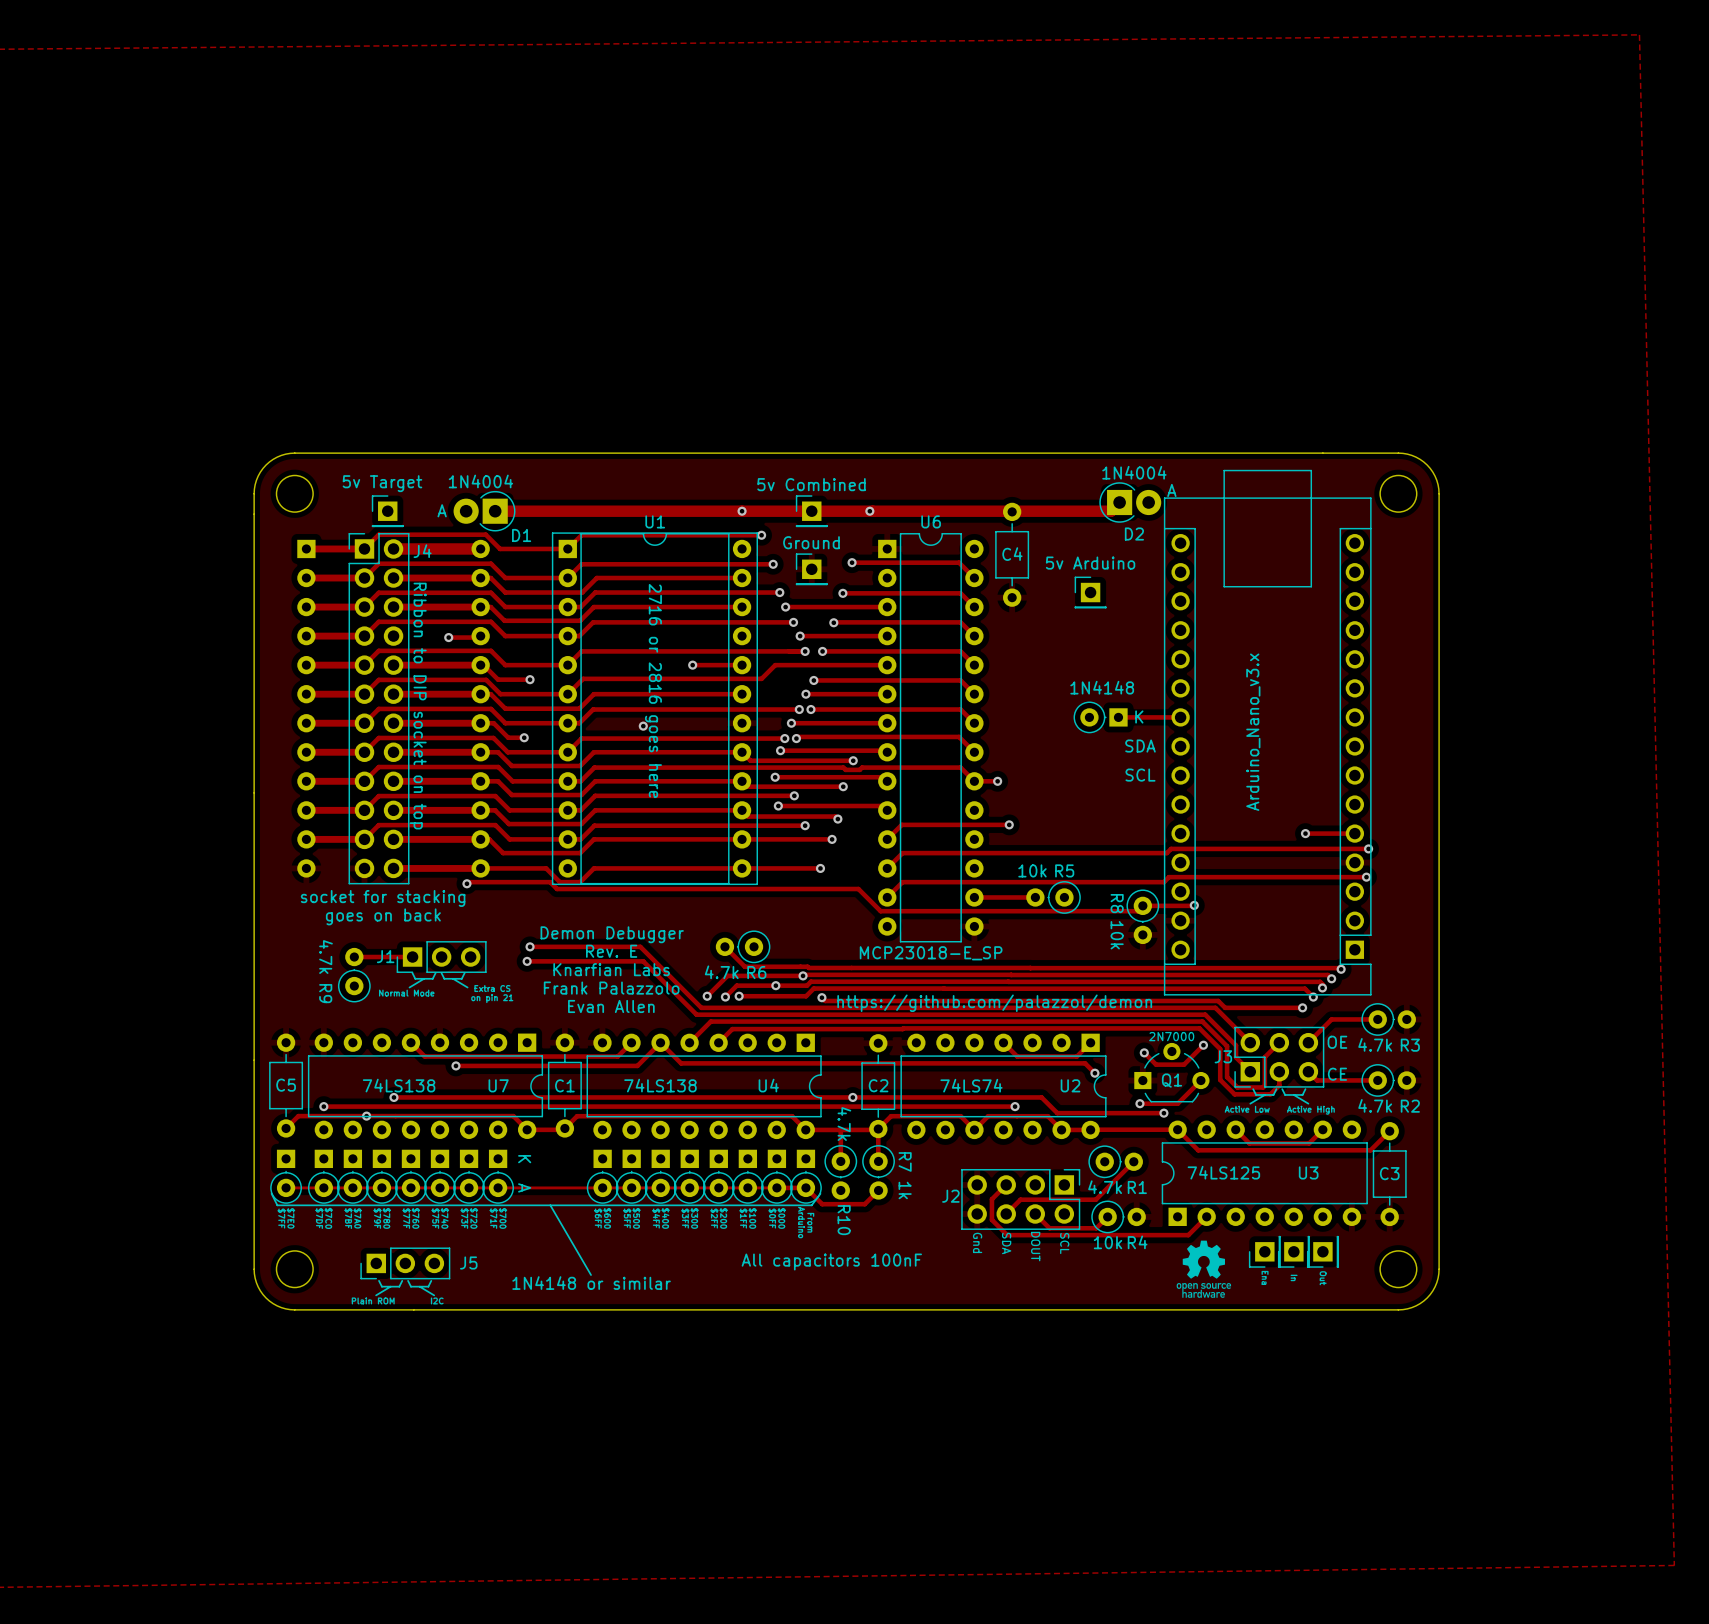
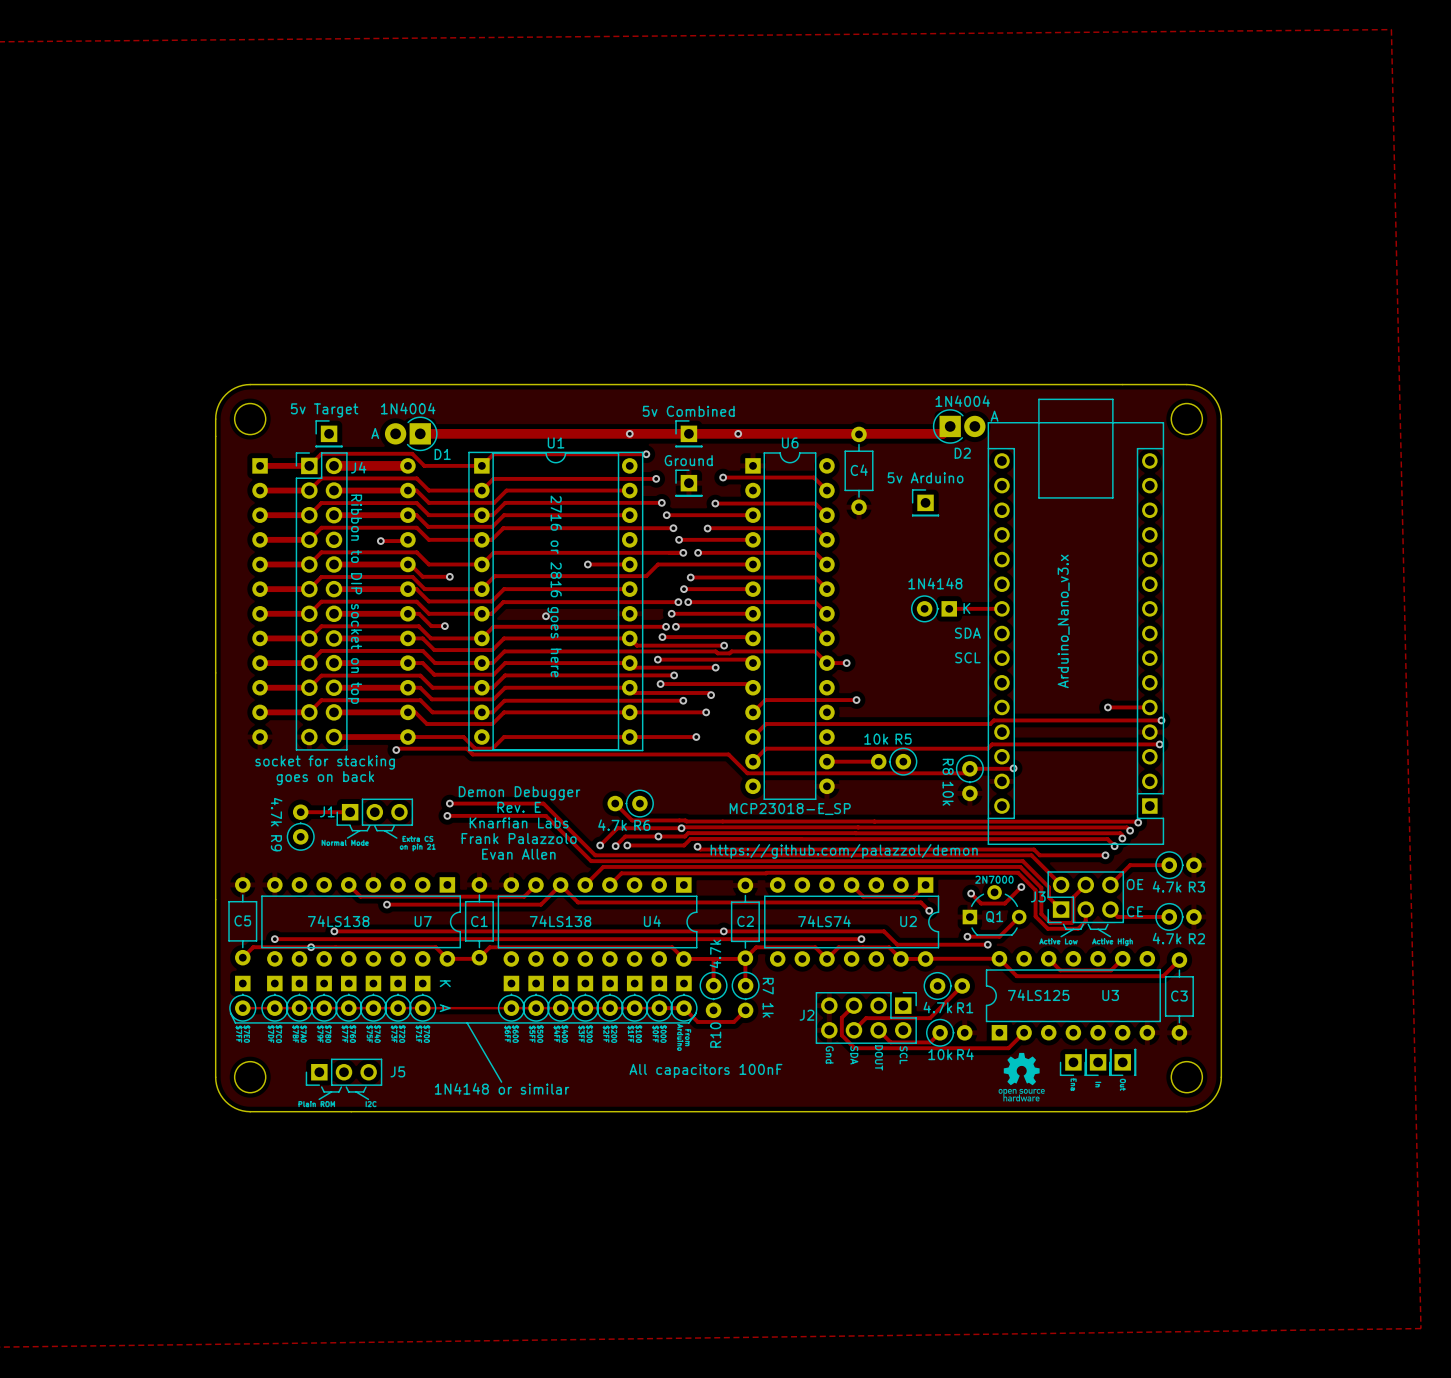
R10 value rotation: 0° (844, 1124) -> 180° (715, 953)
R10 name rotation: 0° (844, 1220) -> 180° (715, 1035)

